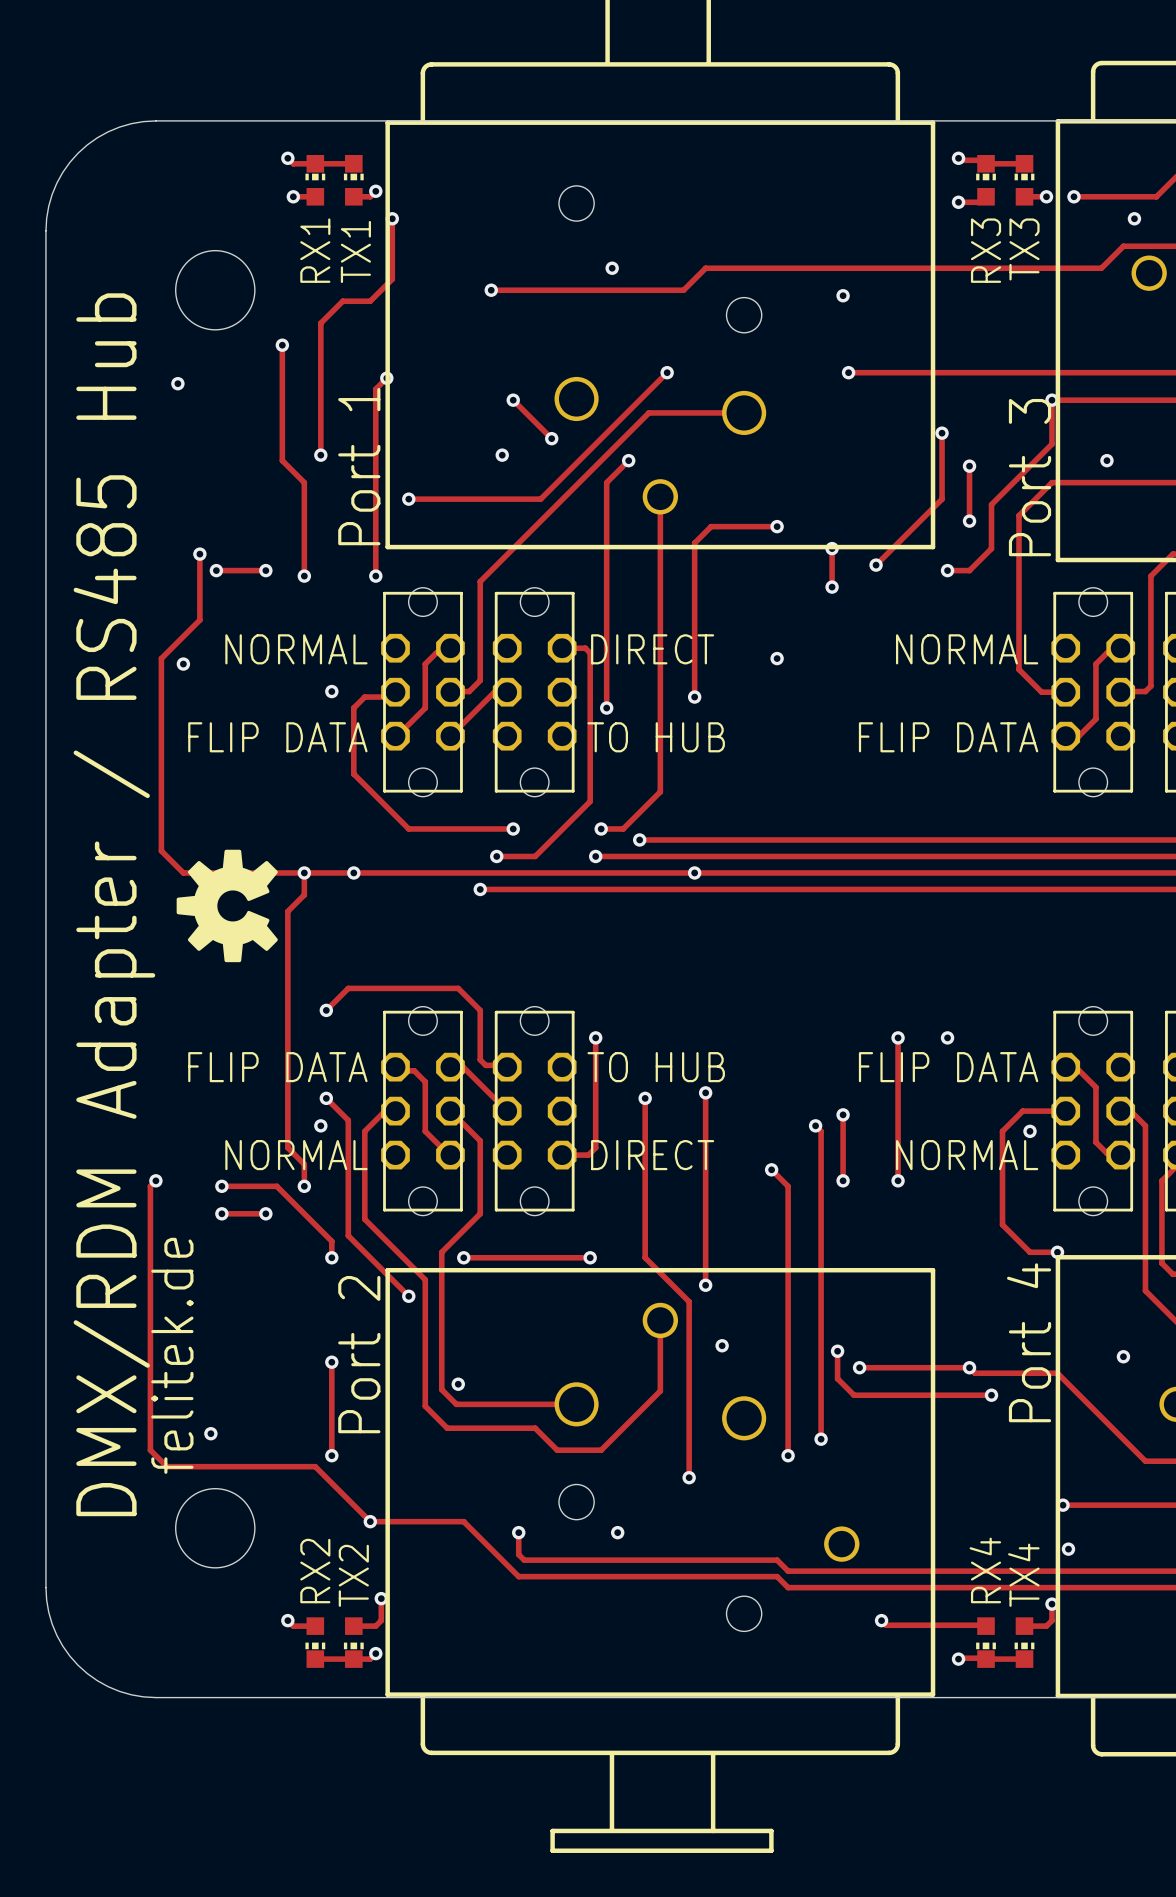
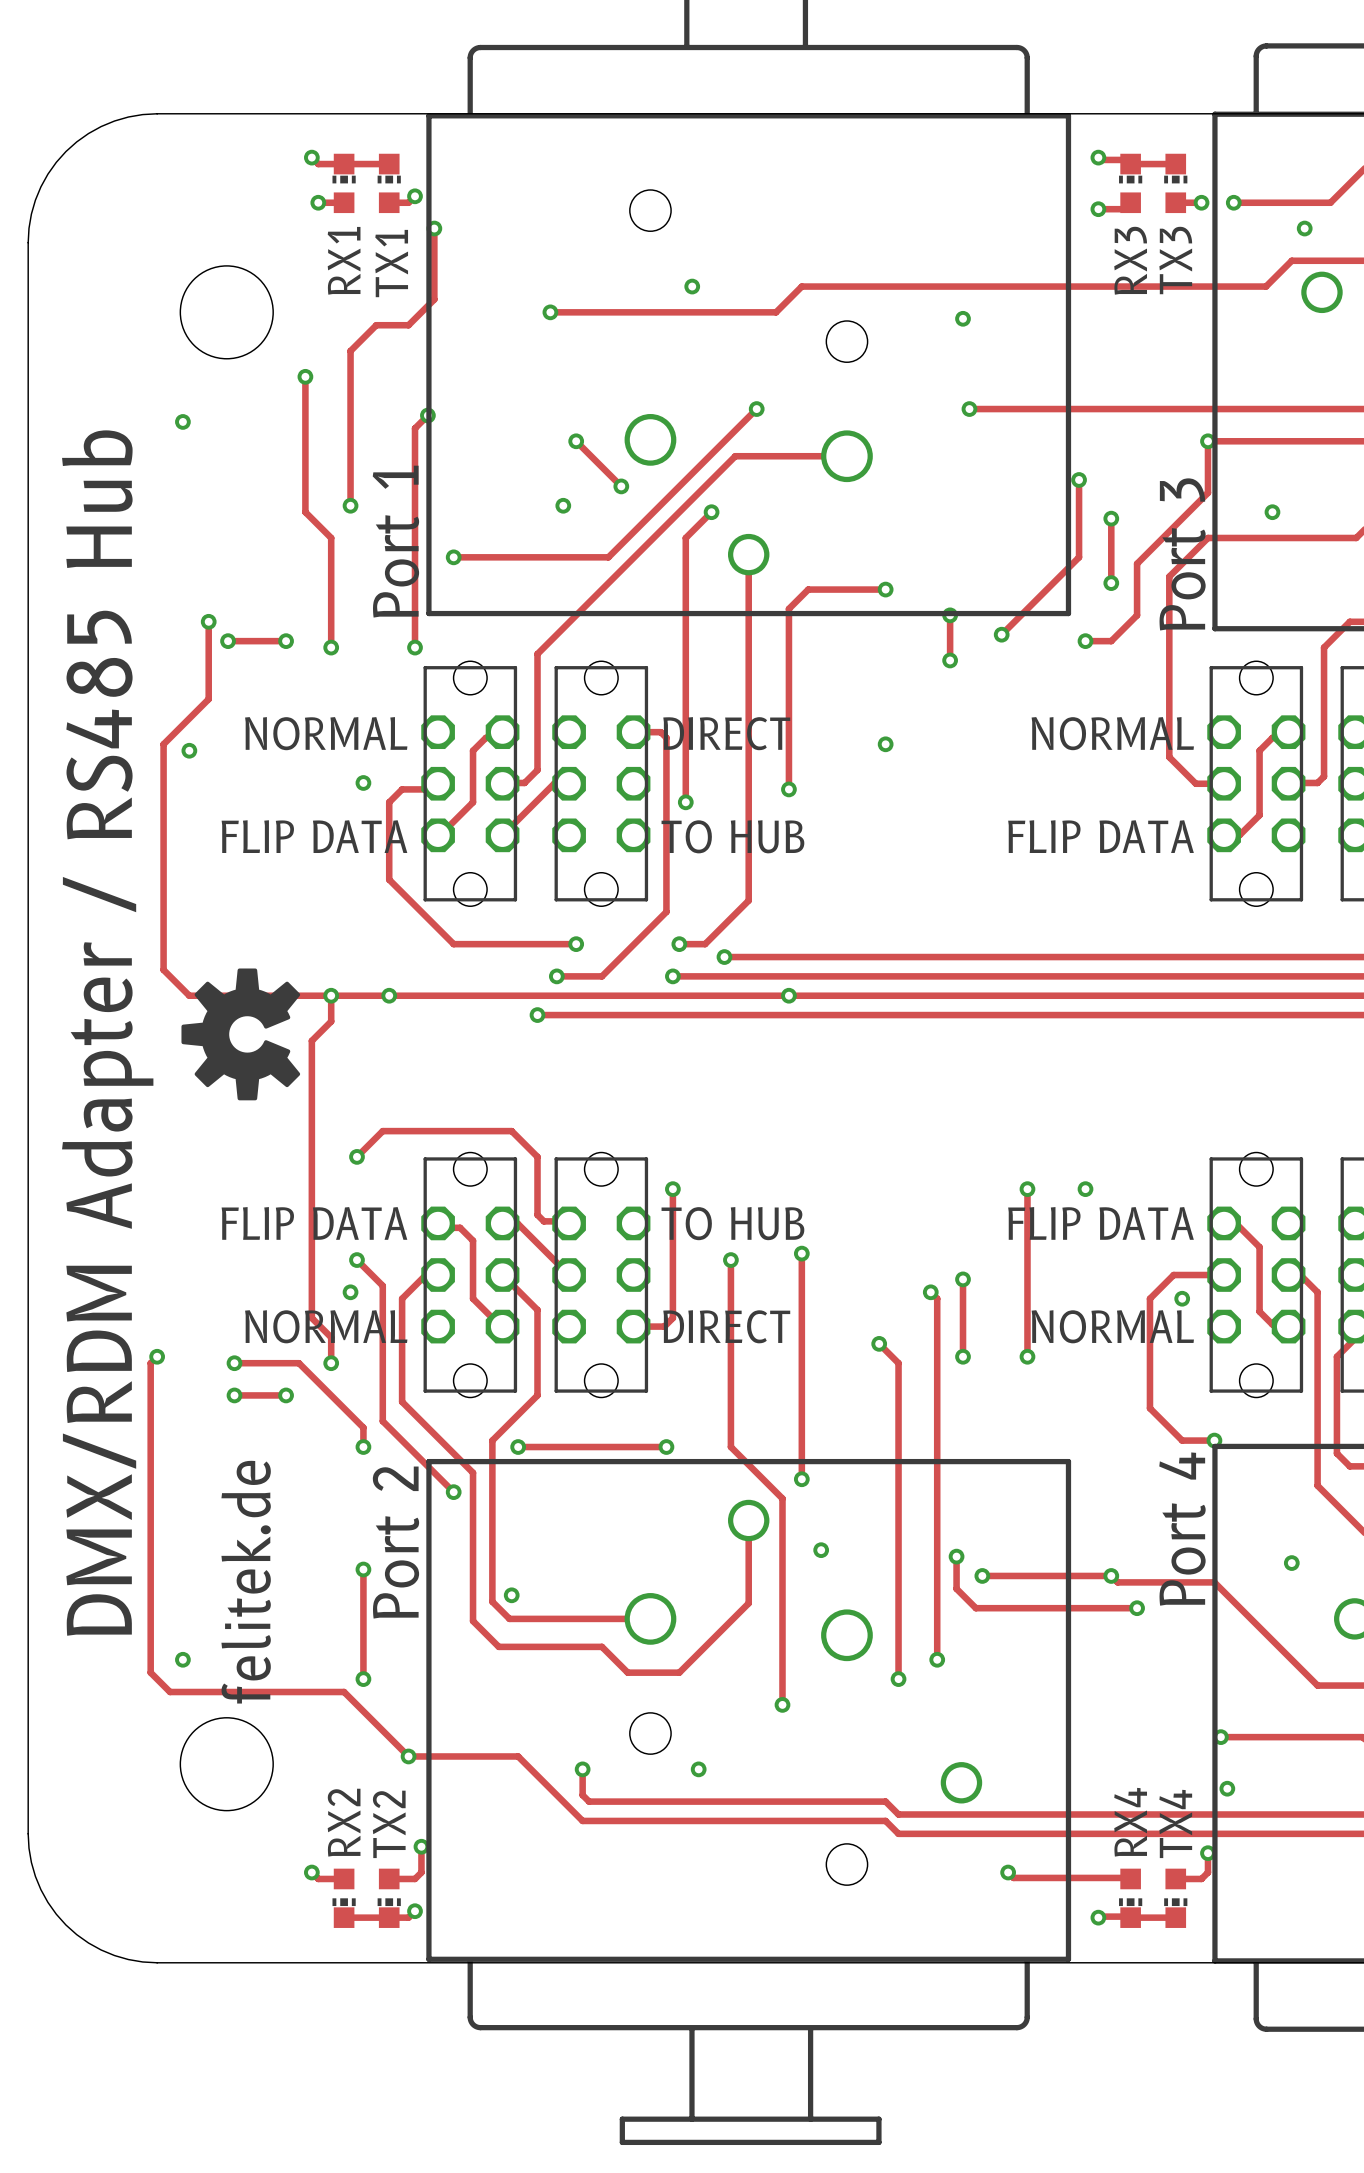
text position: felitek.de (172, 1355) -> felitek.de (246, 1582)
via position: (210, 1433) -> (182, 1659)

